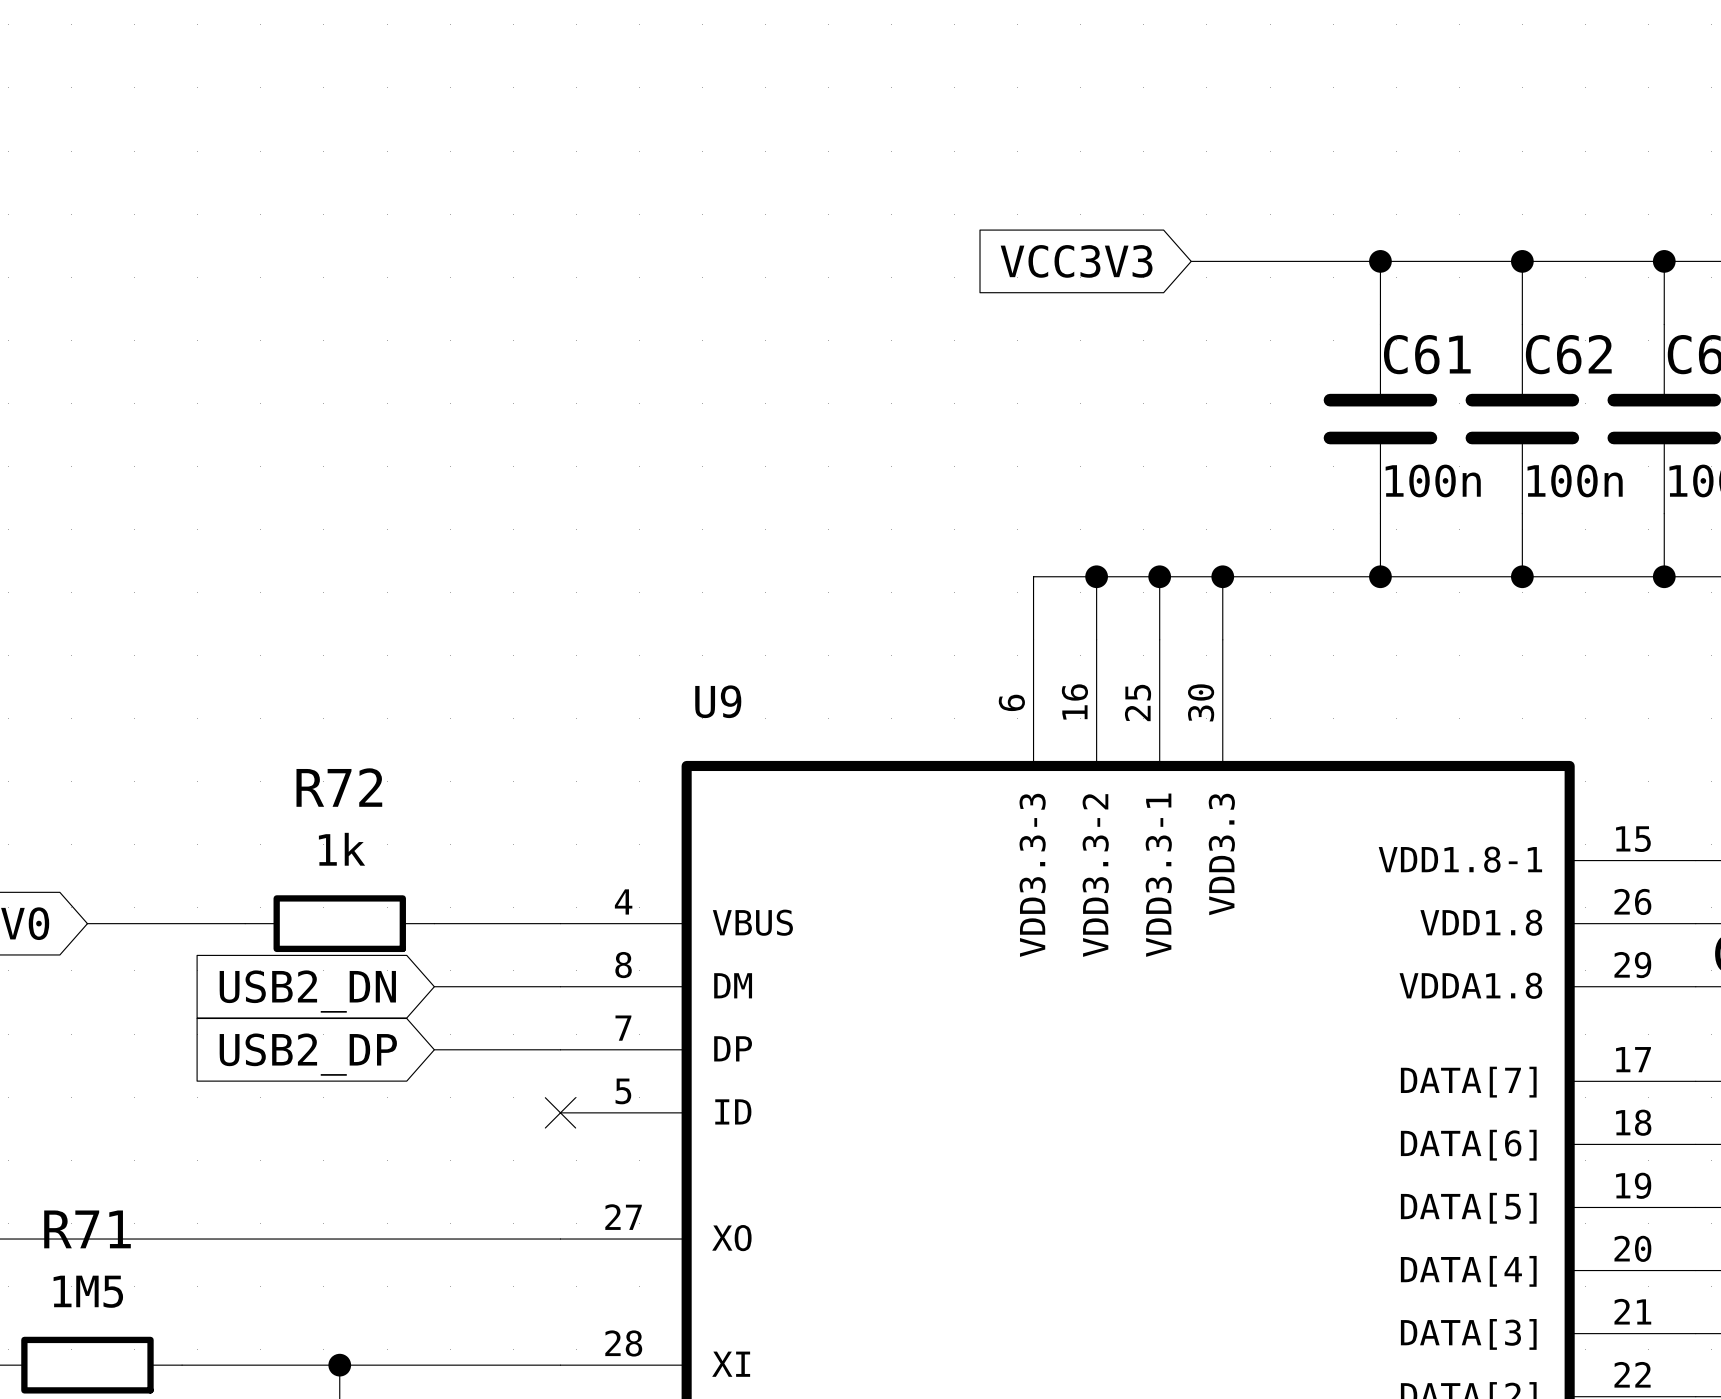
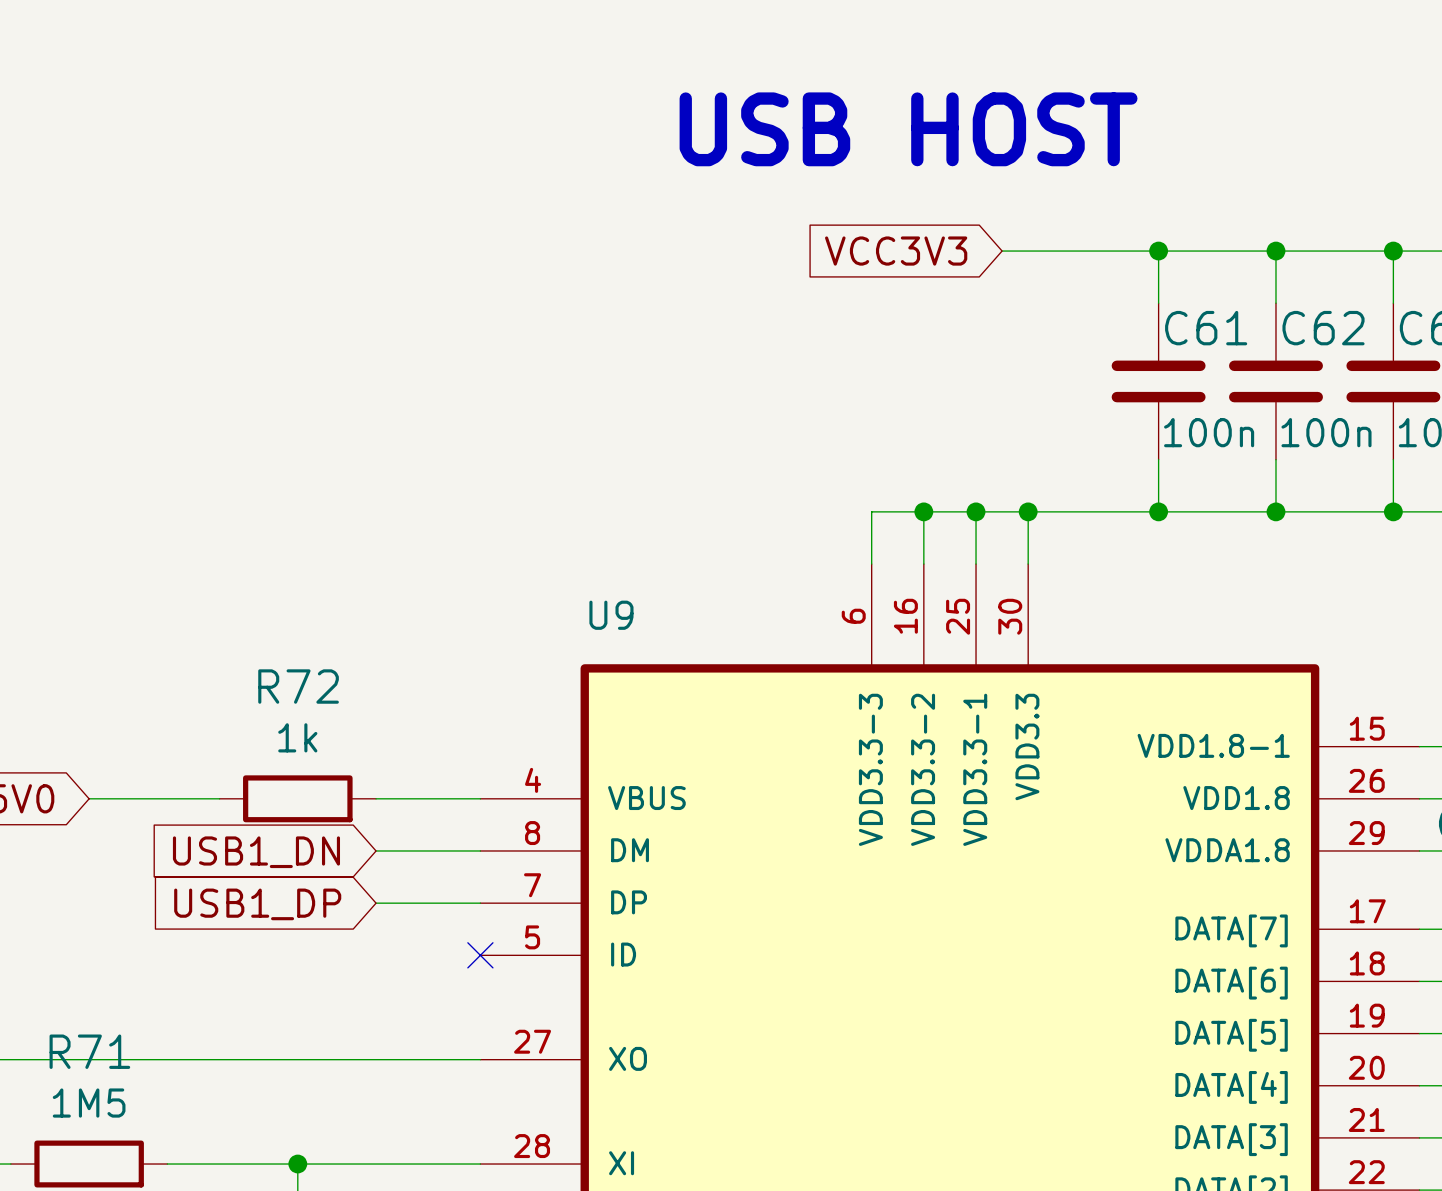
text: none -> USB HOST (908, 129)
global label: USB2_DN (307, 991) -> USB1_DN (256, 852)
global label: USB2_DP (308, 1054) -> USB1_DP (257, 904)

